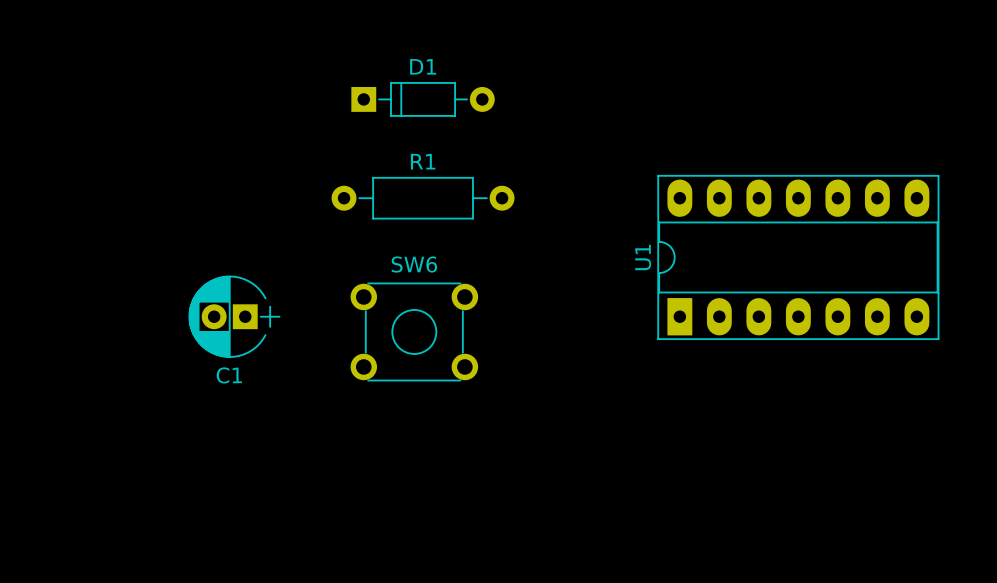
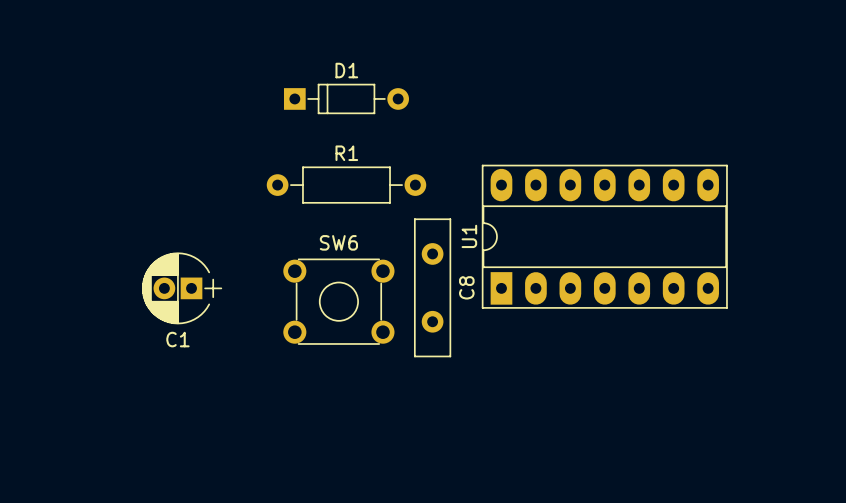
U1 position: (798, 257) -> (604, 236)
C8: none -> (432, 287)

